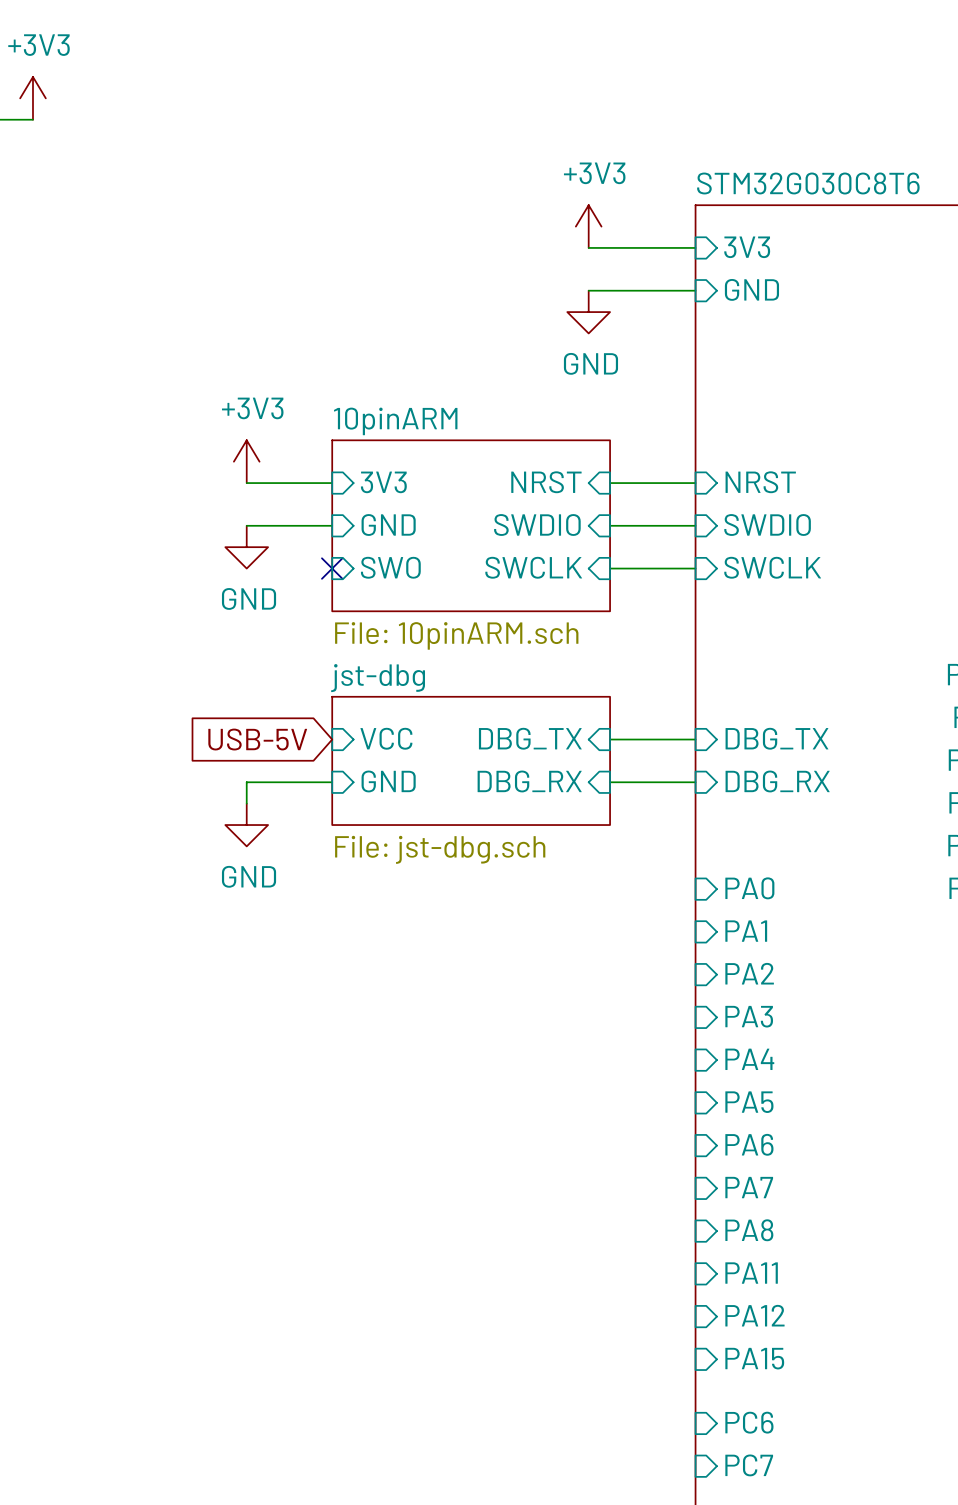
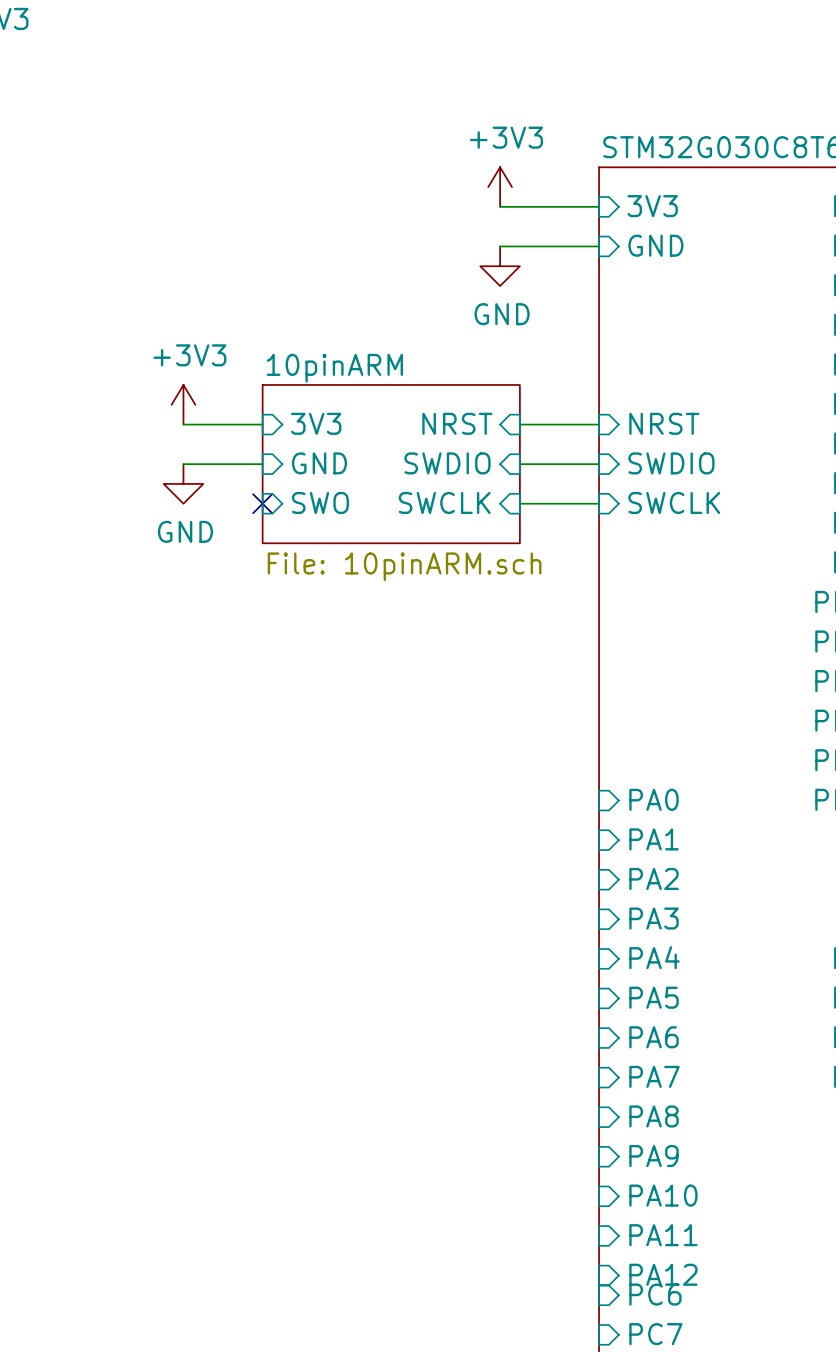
sheet pin: VCC (386, 738) -> none
sheet pin: DBG_TX (530, 738) -> none
sheet pin: DBG_TX (776, 738) -> none
global label: USB-5V (257, 739) -> none
wire: (610, 739) (695, 739) -> none
sheet jst-dbg: File: jst-dbg.sch (471, 760) -> none
sheet pin: GND (388, 781) -> none
sheet pin: DBG_RX (529, 781) -> none
sheet pin: DBG_RX (777, 781) -> none
wire: (332, 782) (246, 782) (246, 803) -> none
wire: (610, 782) (695, 782) -> none
power symbol: GND (246, 825) -> none
sheet pin: PA11 (751, 1273) -> PA9 (654, 1156)
sheet pin: PA12 (754, 1315) -> PA10 (663, 1195)
sheet pin: PA15 (754, 1358) -> PA11 (663, 1235)
sheet pin: none -> PA12 (663, 1274)

